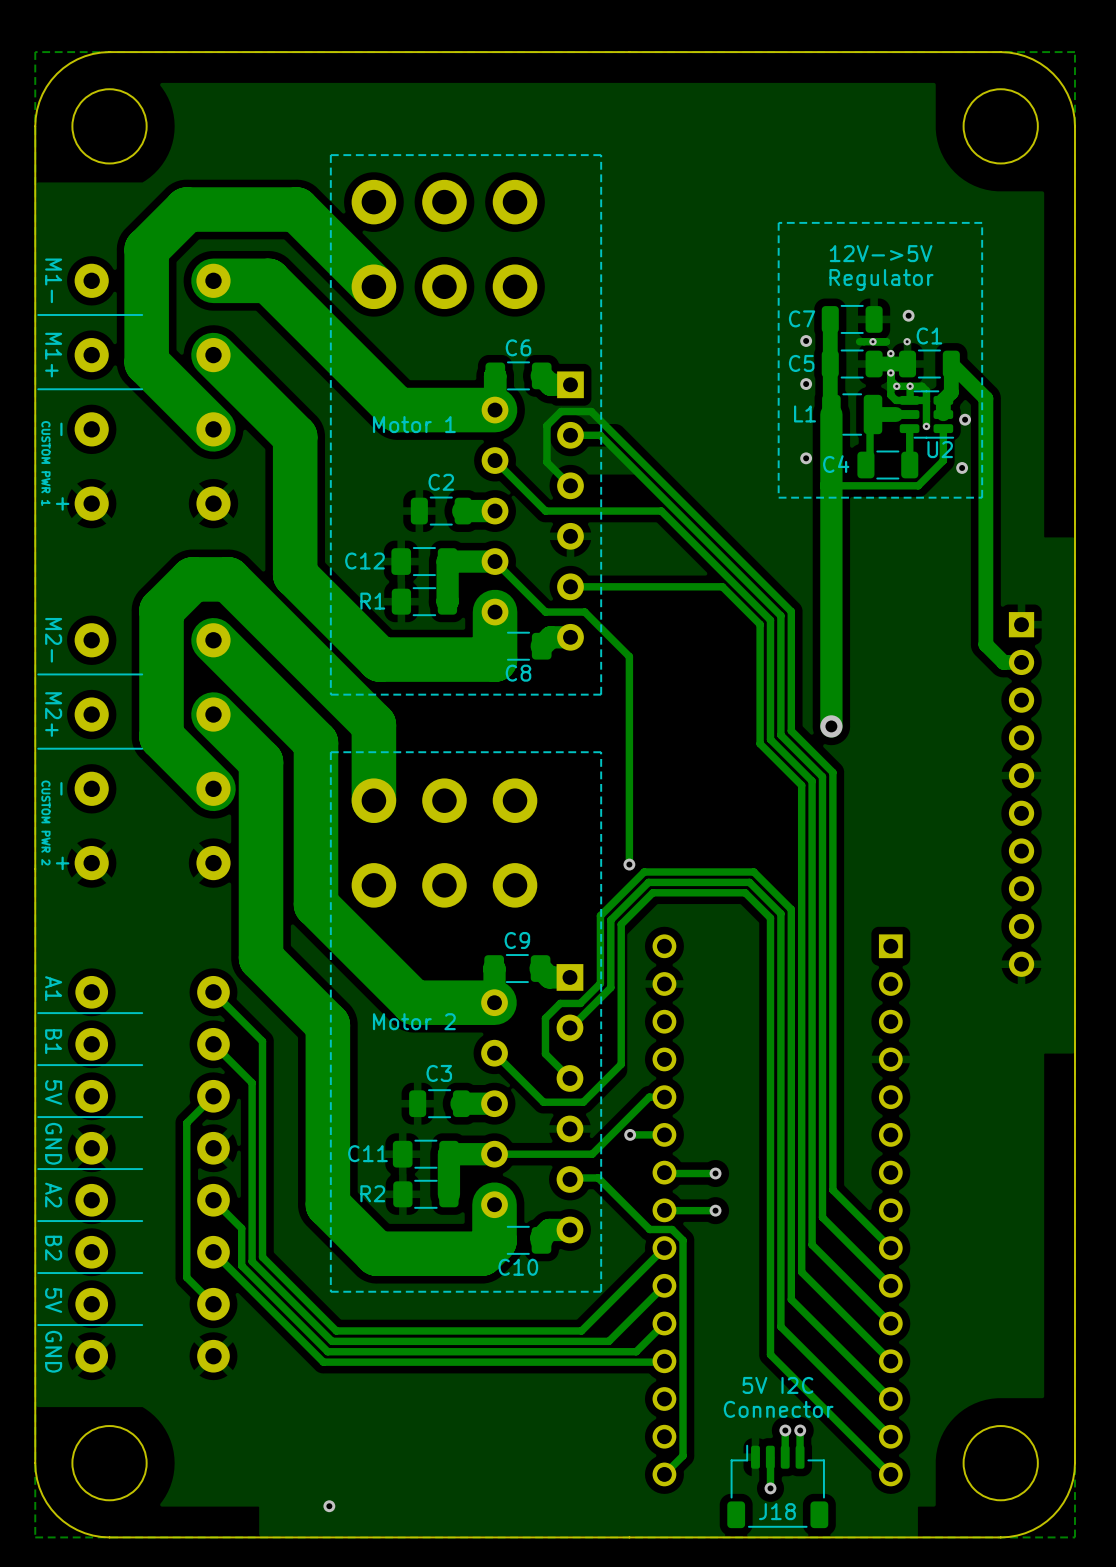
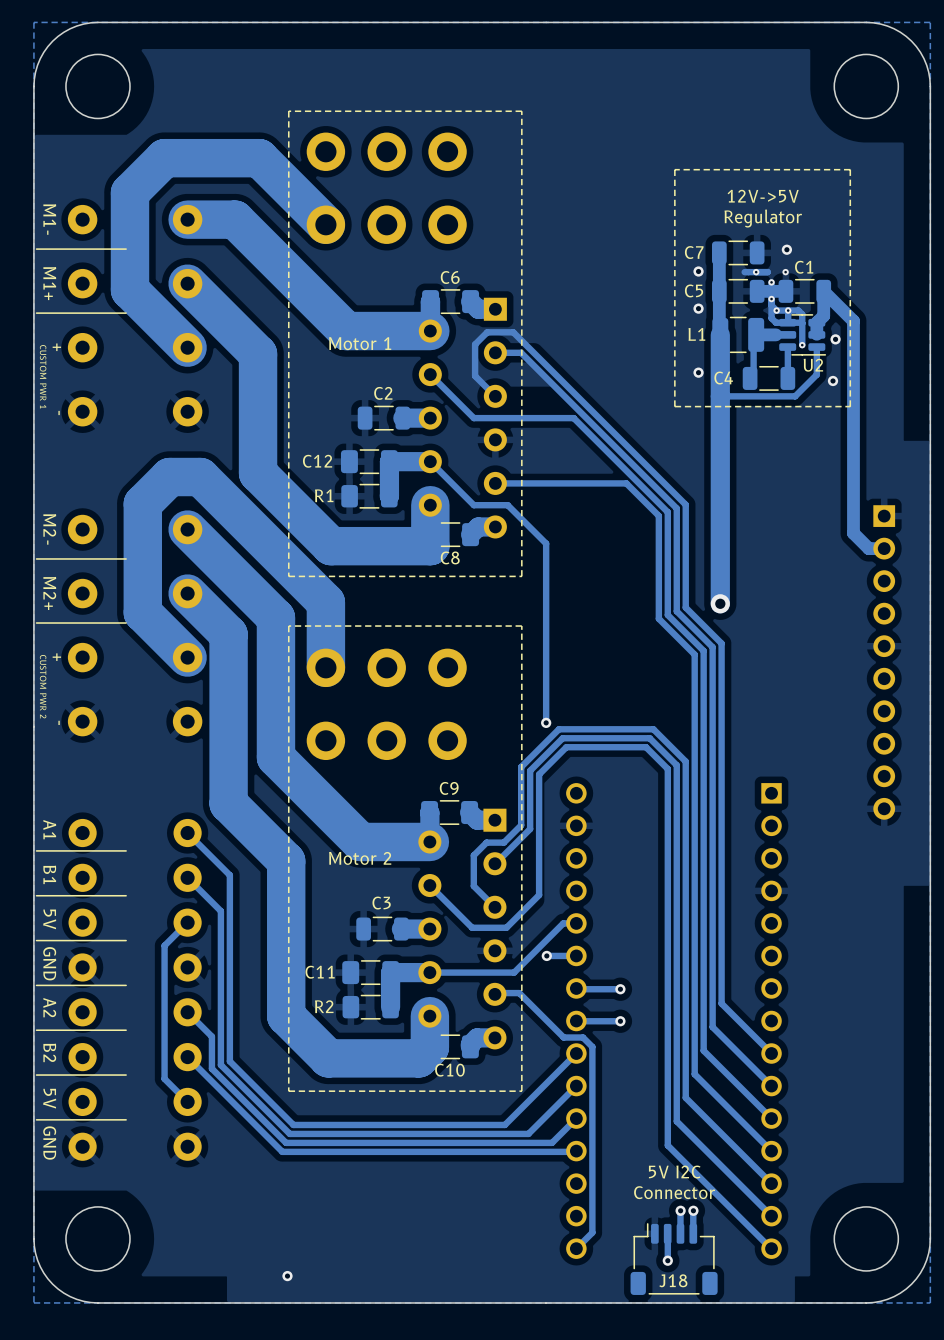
text: - (61, 429) -> + (56, 347)
text: + (62, 503) -> - (59, 413)
text: - (61, 788) -> + (56, 657)
text: + (62, 863) -> - (59, 722)

